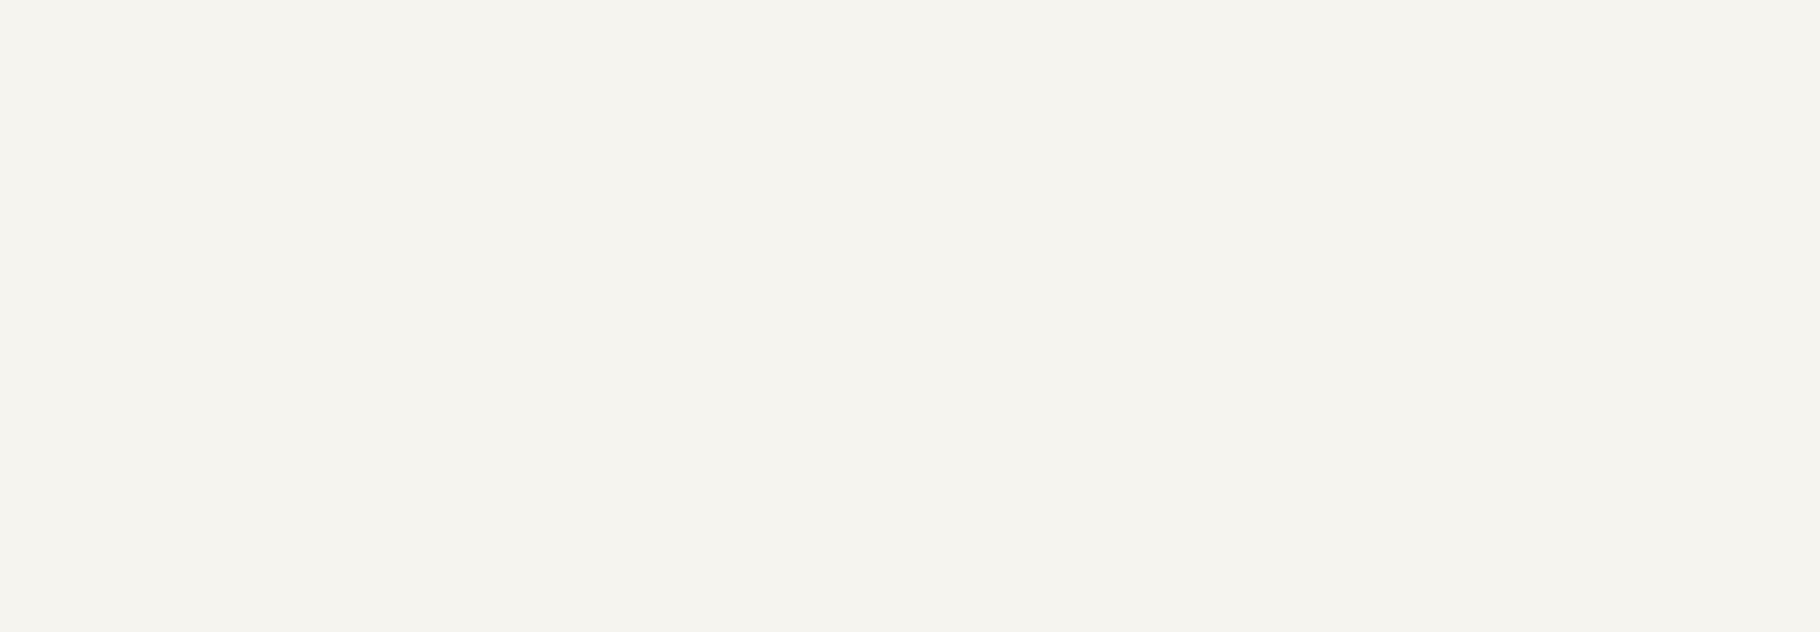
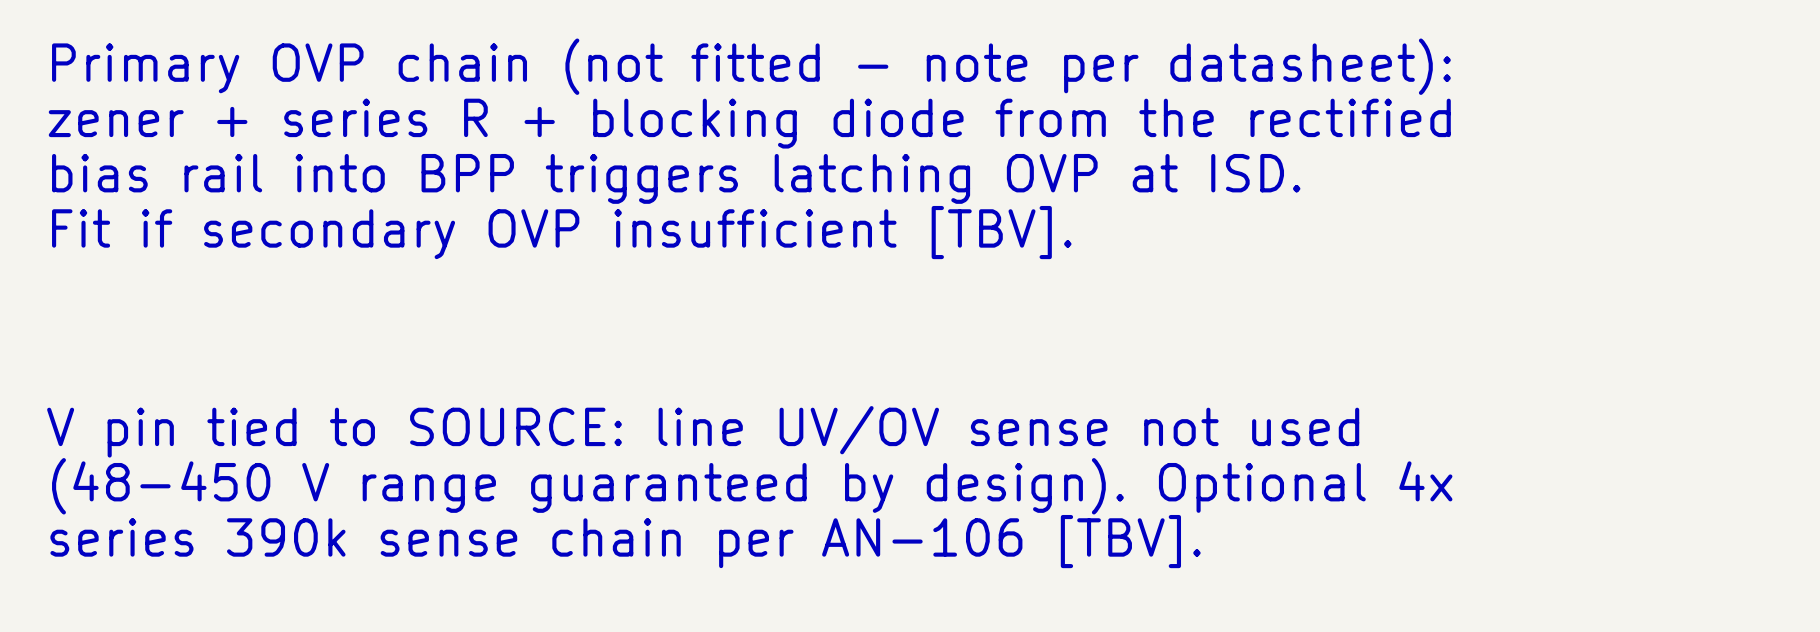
text: none -> Primary OVP chain (not fitted - note per datasheet): (751, 66)
text: none -> zener + series R + blocking diode from the rectified (749, 123)
text: none -> bias rail into BPP triggers latching OVP at ISD. (676, 178)
text: none -> Fit if secondary OVP insufficient [TBV]. (561, 232)
text: none -> V pin tied to SOURCE: line UV/OV sense not used (703, 431)
text: none -> (48-450 V range guaranteed by design). Optional 4x (752, 486)
text: none -> series 390k sense chain per AN-106 [TBV]. (625, 541)

